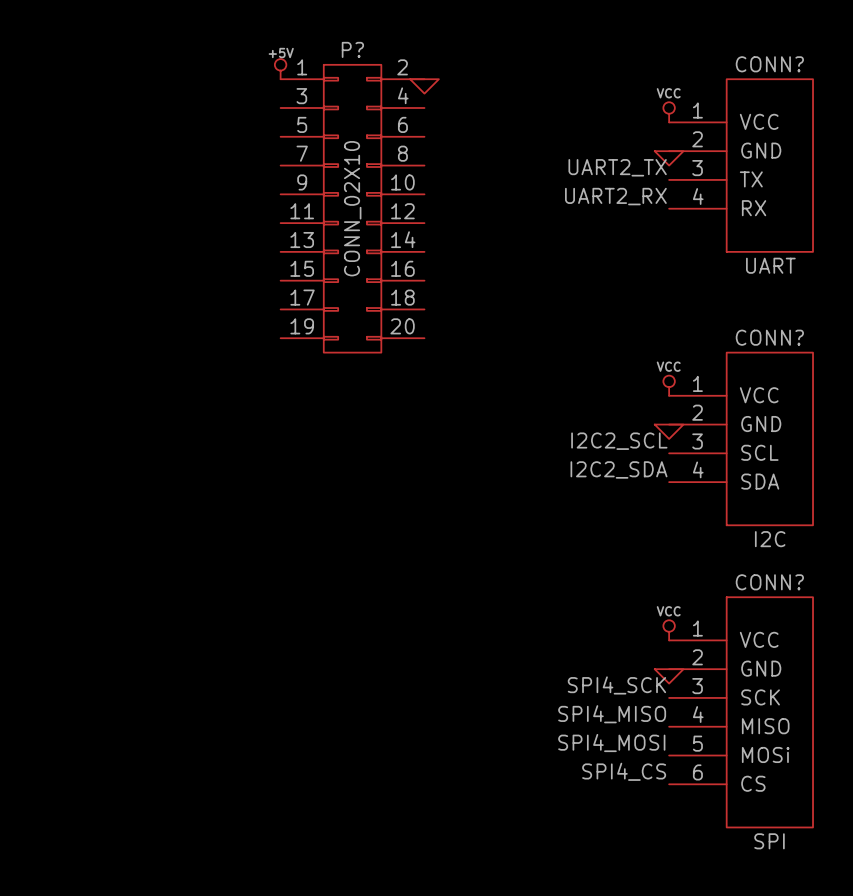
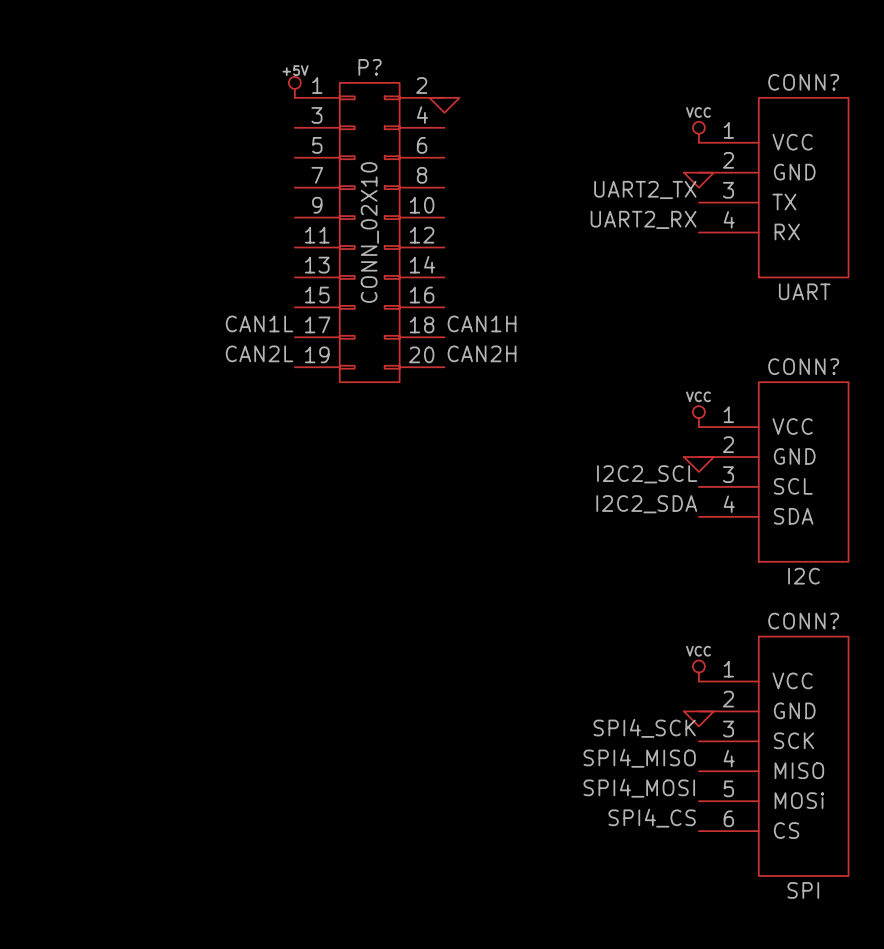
label: none -> CAN1L (259, 323)
label: none -> CAN1H (482, 323)
label: none -> CAN2L (259, 353)
label: none -> CAN2H (482, 353)

